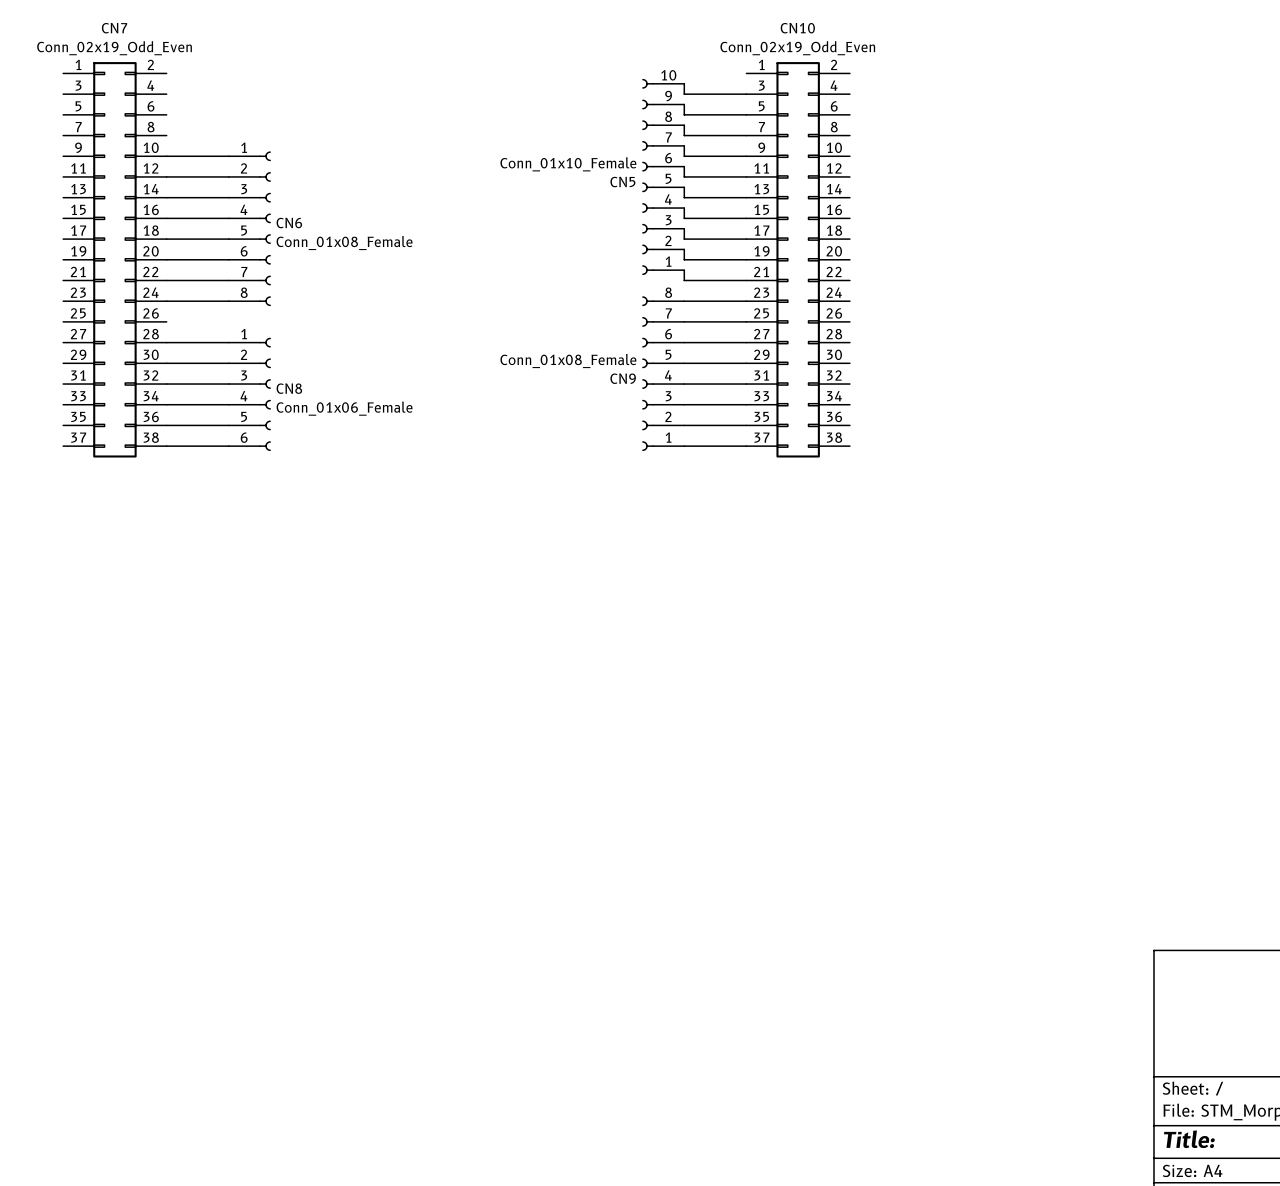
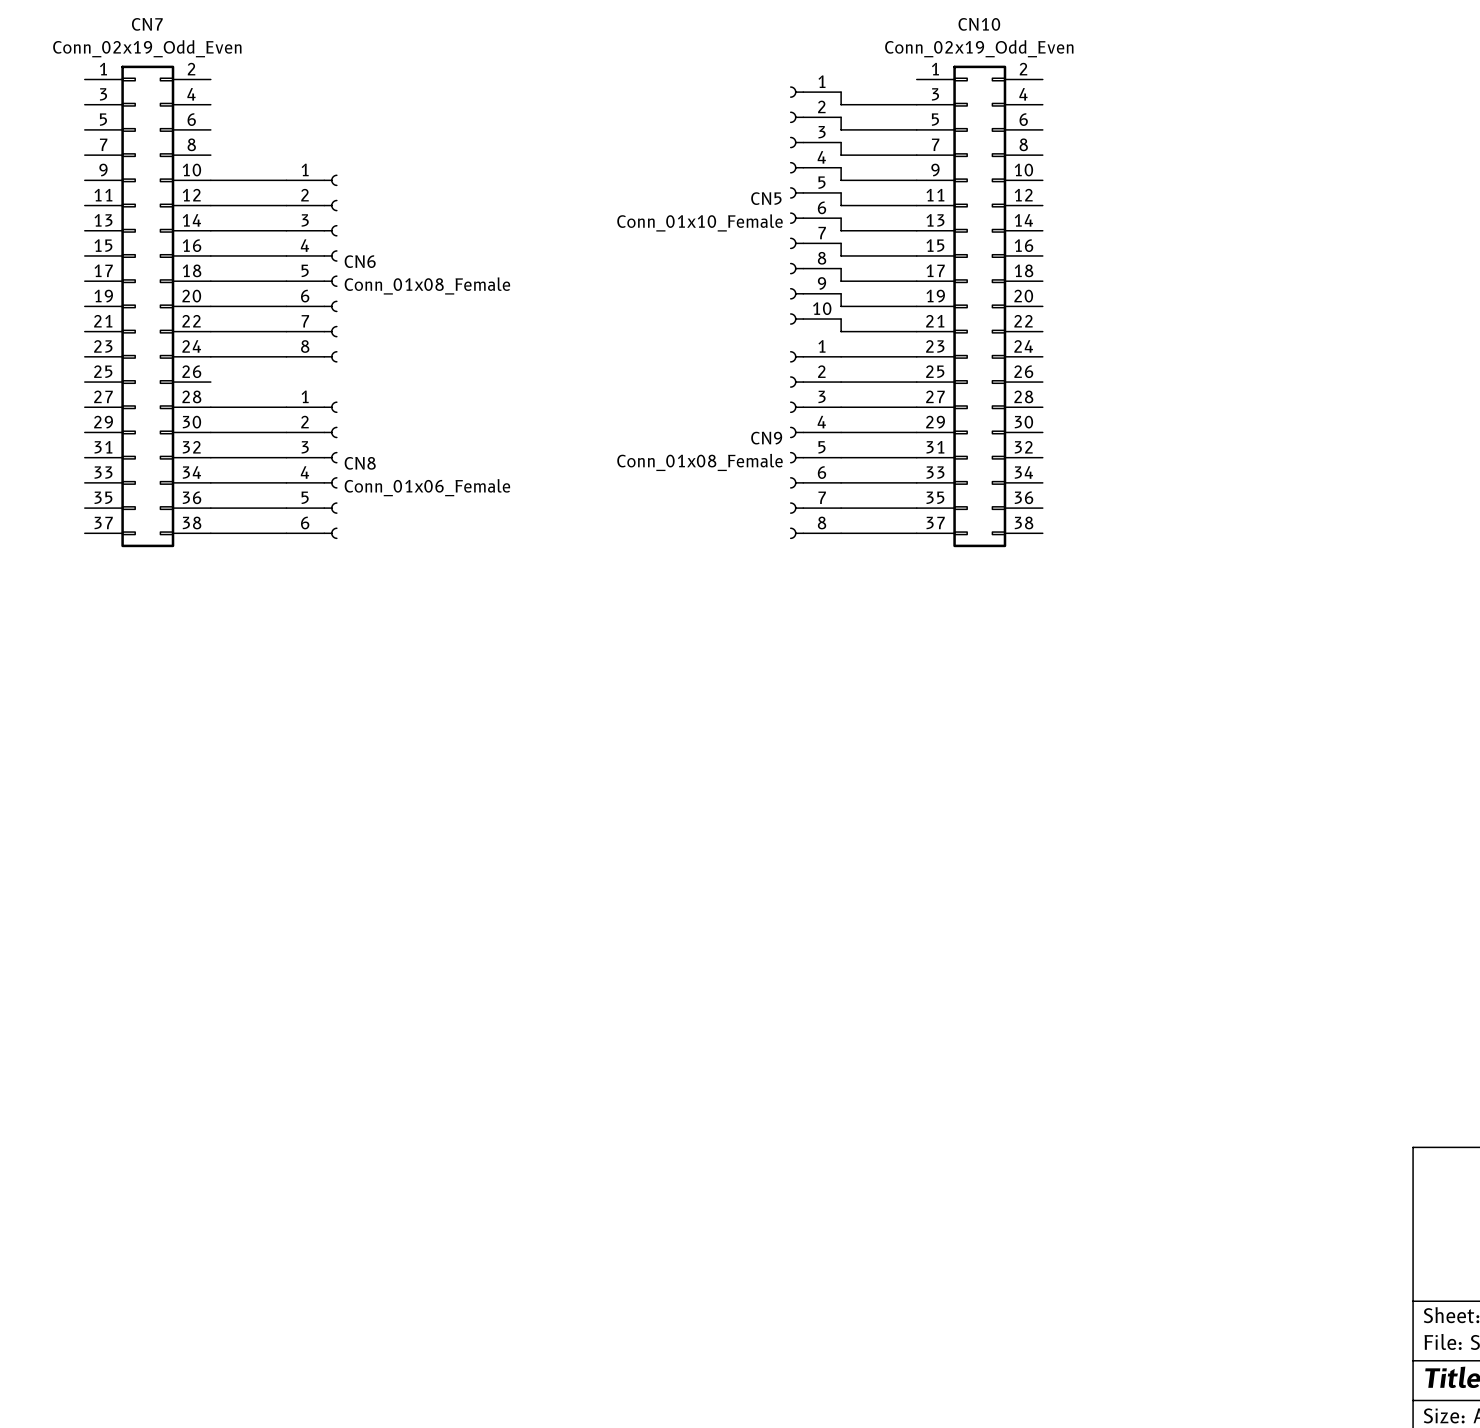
CN5 flip: as is (648, 176) -> up-down (796, 205)
CN9 flip: as is (648, 373) -> up-down (796, 445)

